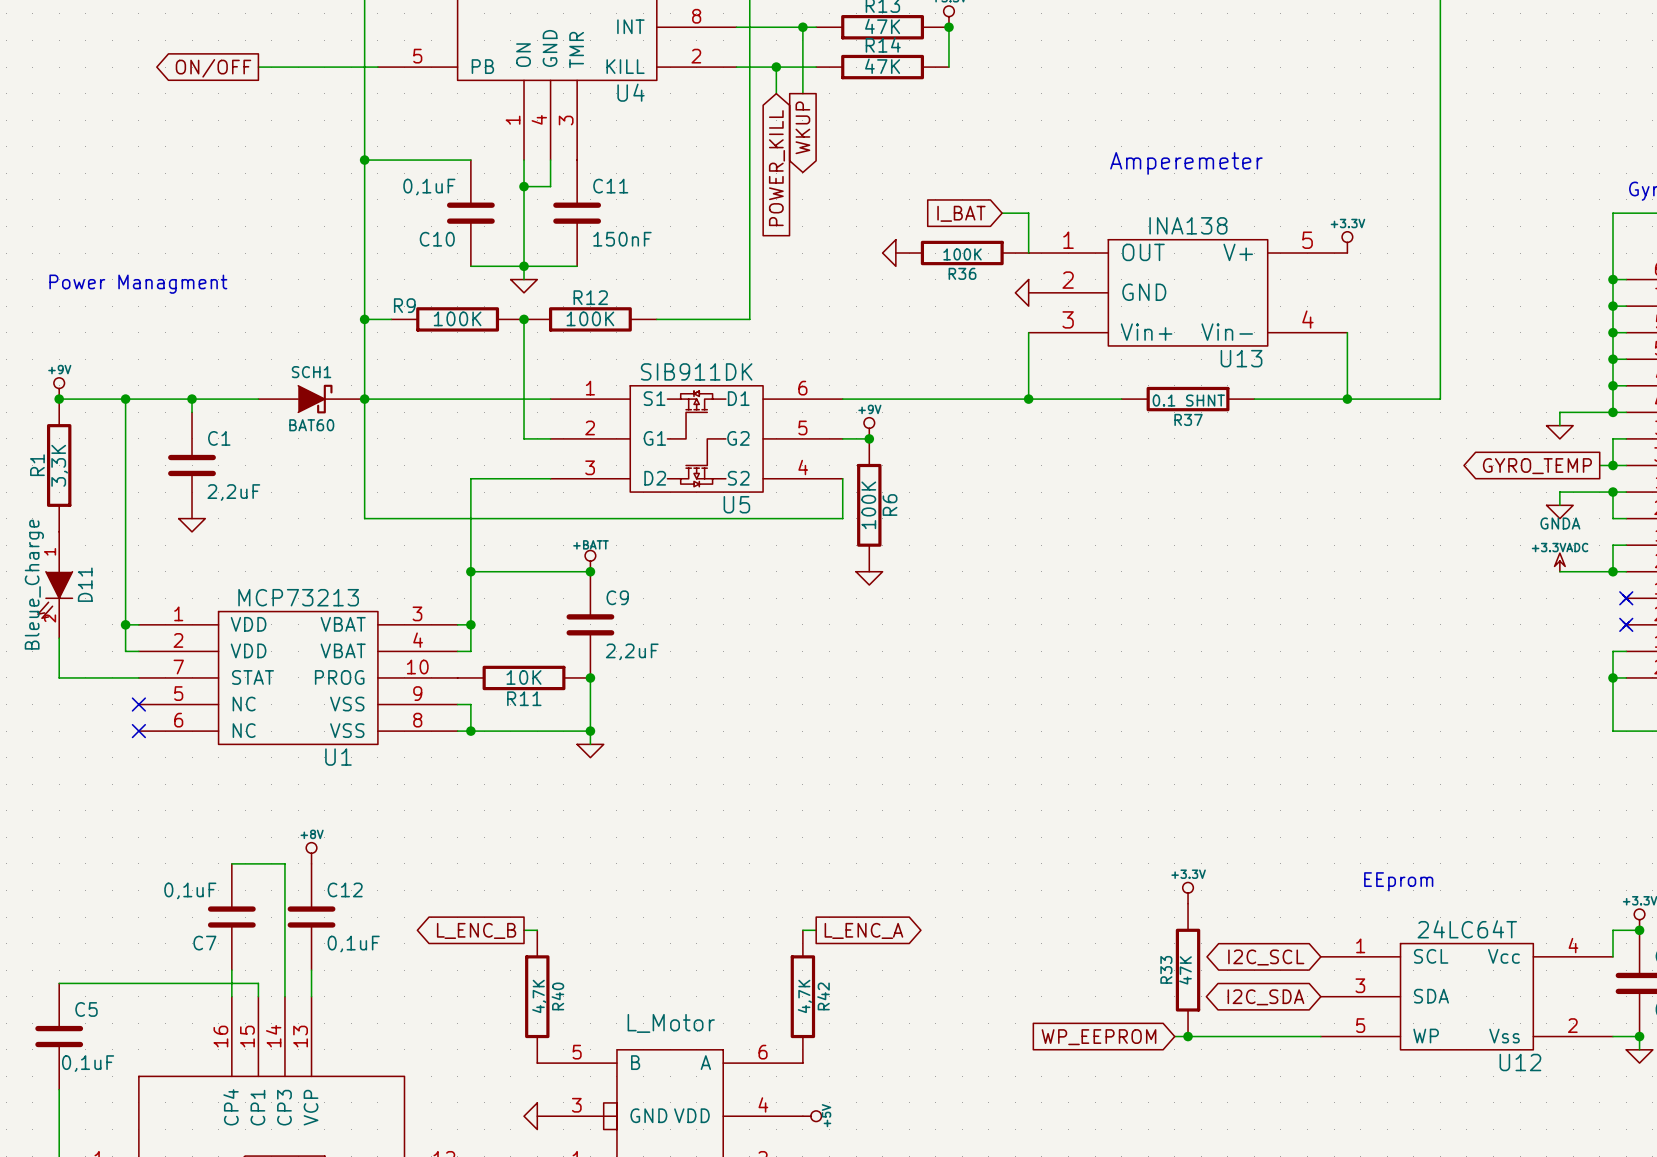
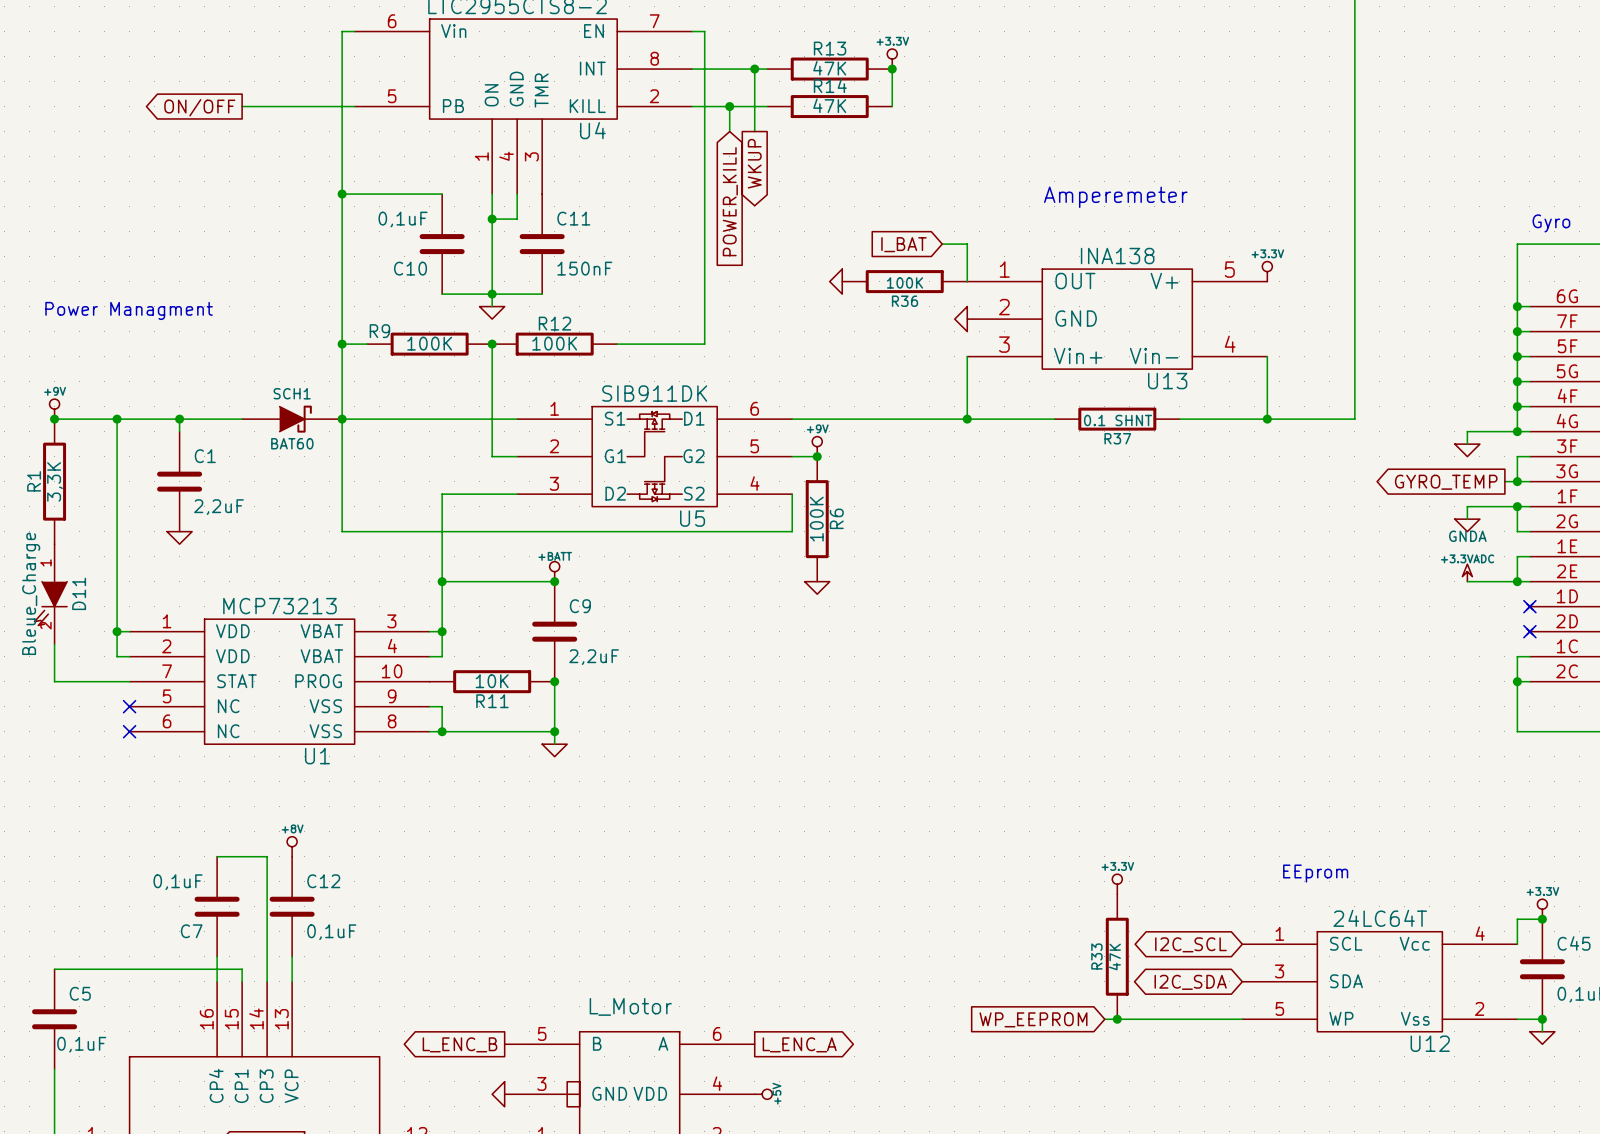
global label position: L_ENC_B (476, 930) -> L_ENC_B (459, 1044)
wire: (524, 930) (537, 930) -> none
wire: (802, 930) (816, 930) -> none
global label position: L_ENC_A (863, 930) -> L_ENC_A (799, 1044)
R40: 4,7K (537, 996) -> none
R42: 4,7K (802, 996) -> none

